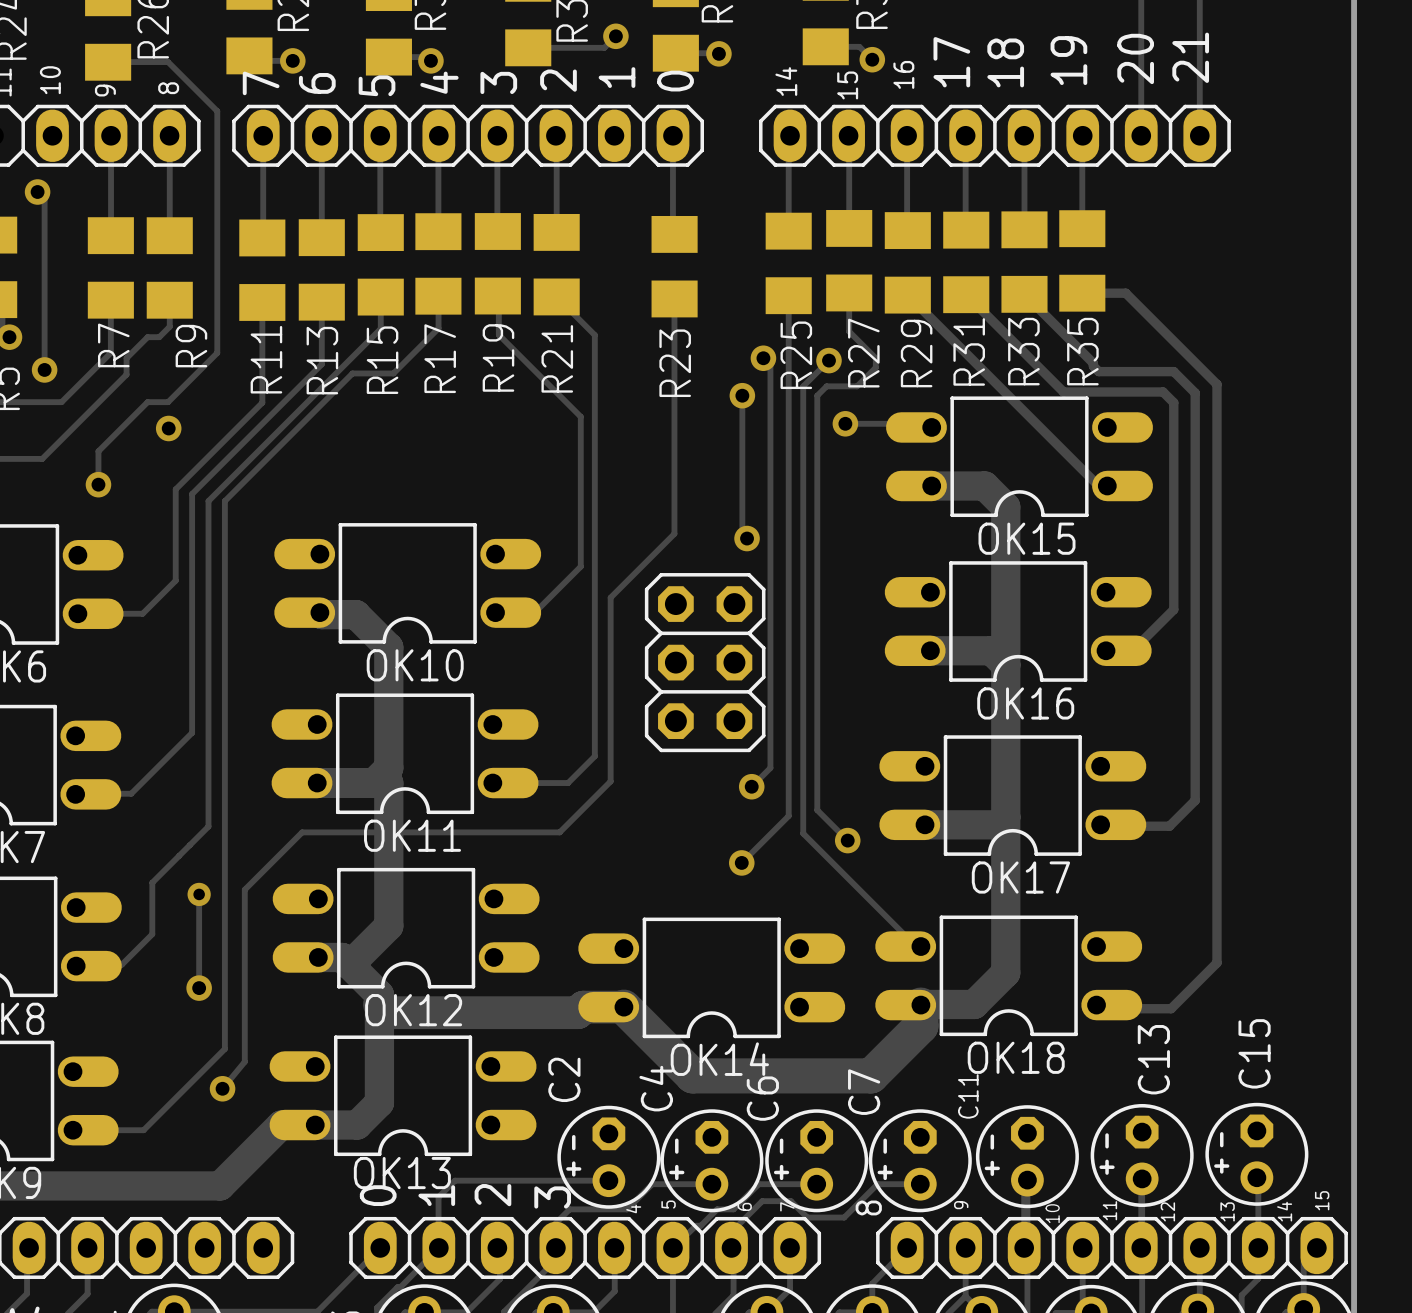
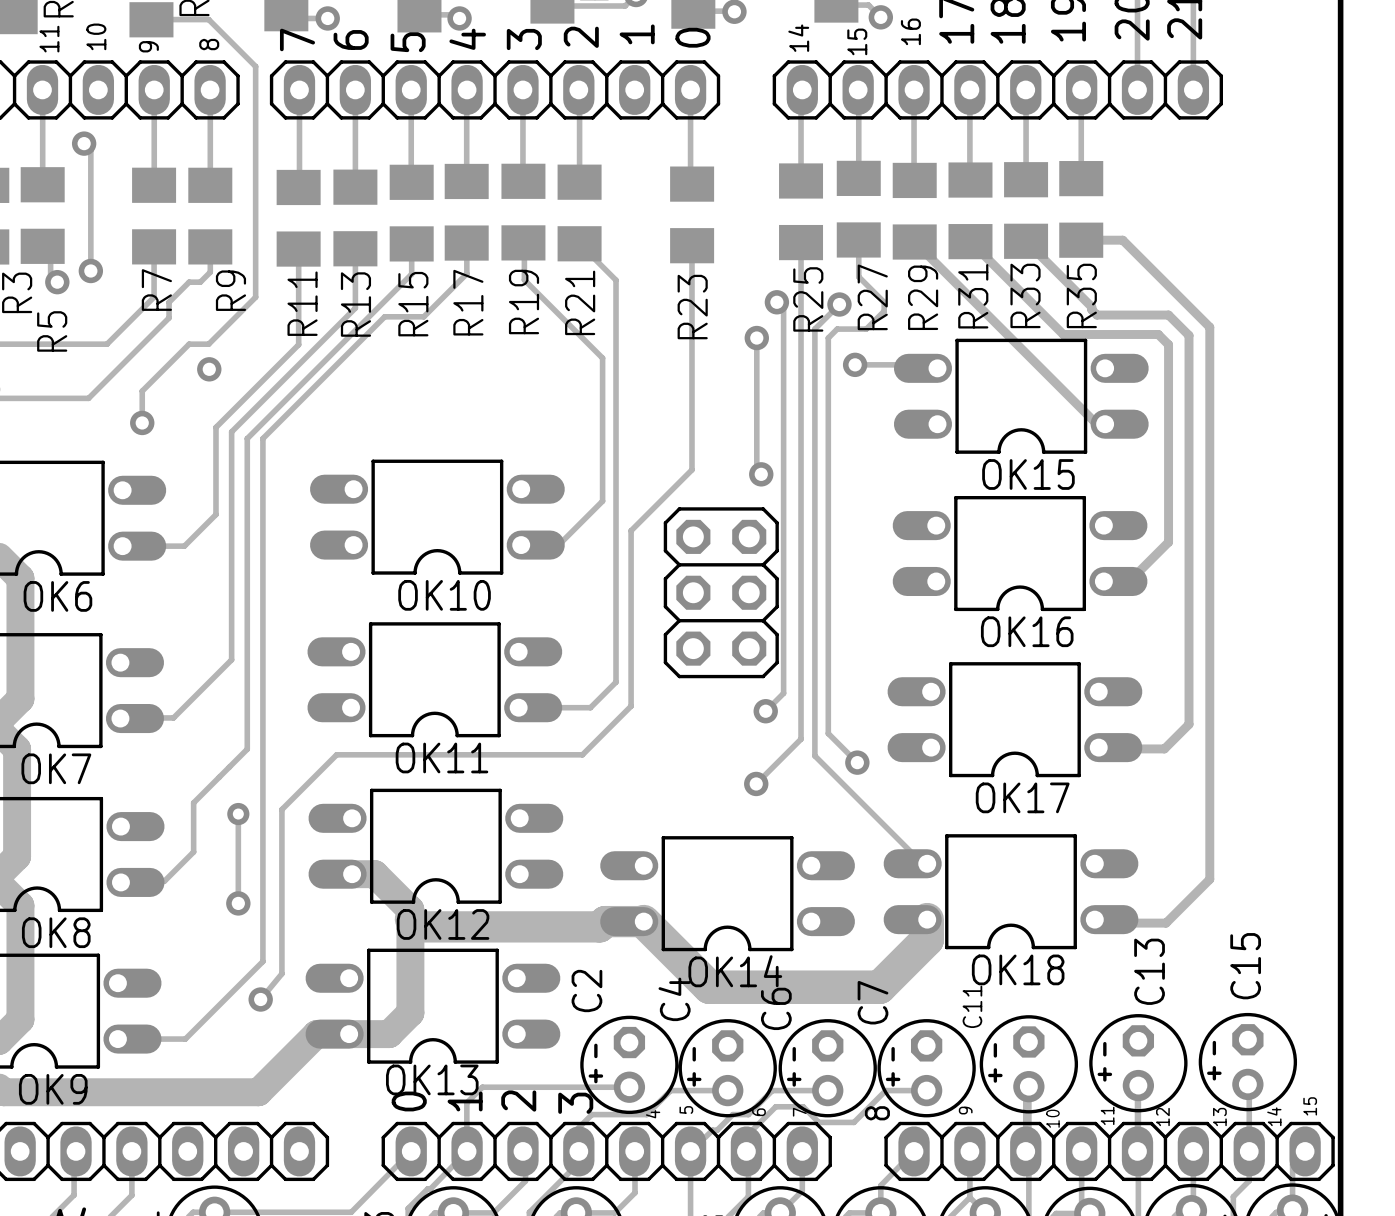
track: (44, 325) (44, 369) -> none
via position: (44, 369) -> (90, 270)
track: (931, 486) (984, 486) (1005, 506) (1005, 972) (974, 1004) (920, 1005) -> none
track: (319, 612) (321, 614) (356, 614) (388, 647) (388, 768) (373, 783) -> none
track: (930, 650) (991, 650) (1005, 664) -> none
track: (317, 783) (388, 783) (388, 926) (349, 965) -> none
track: (1005, 817) (998, 824) (925, 824) -> none

